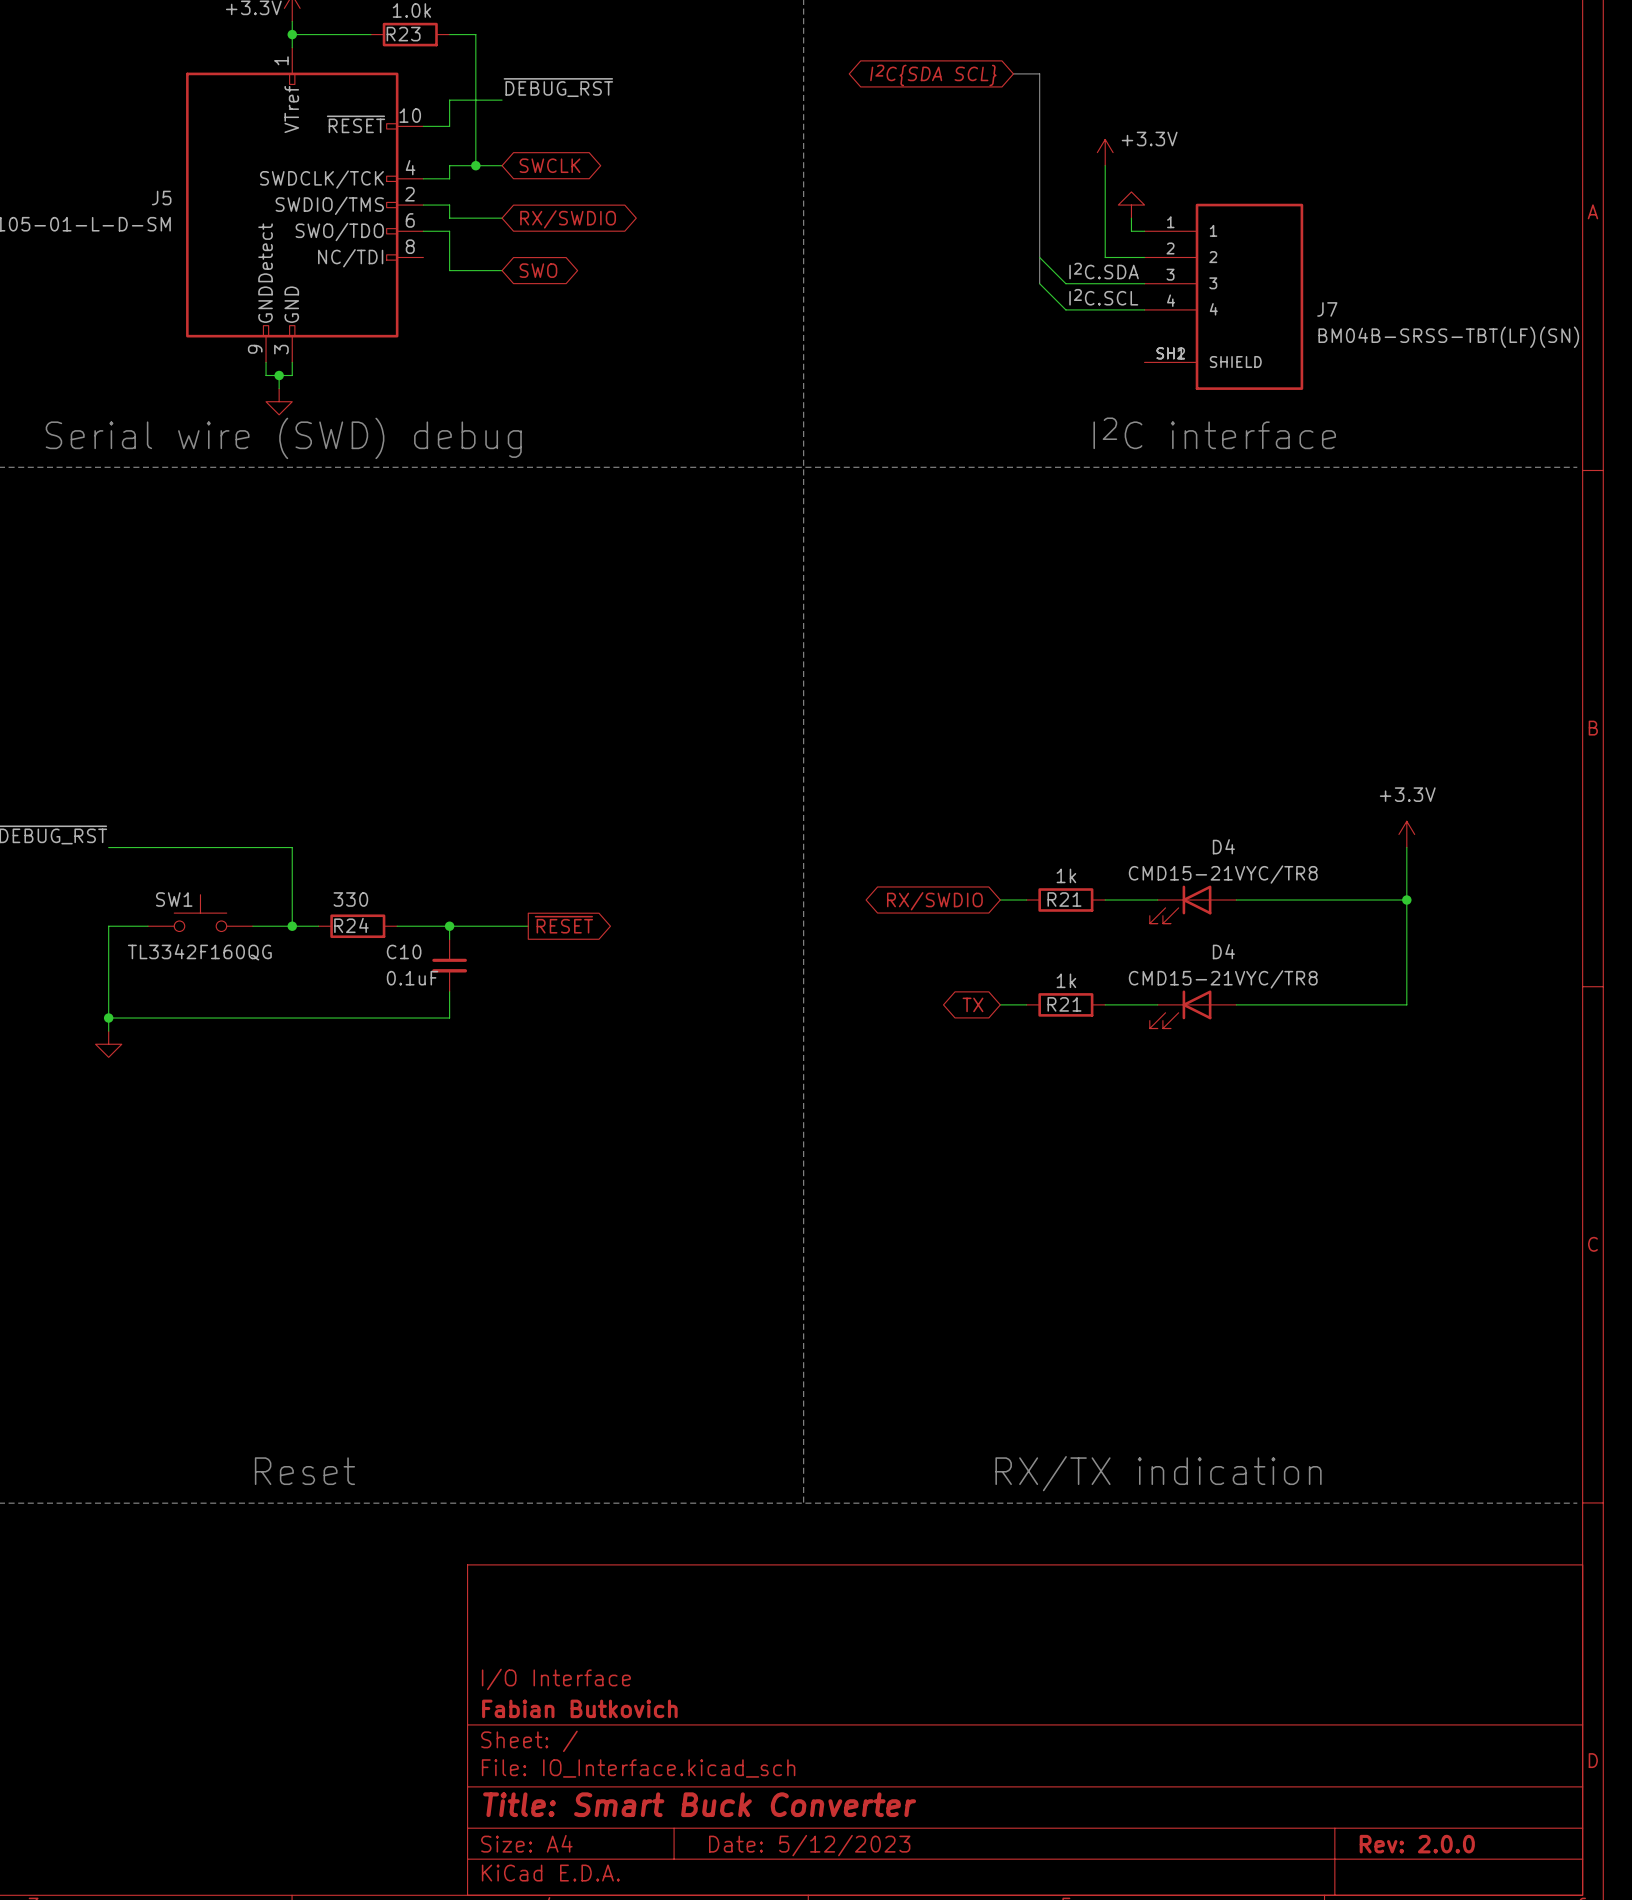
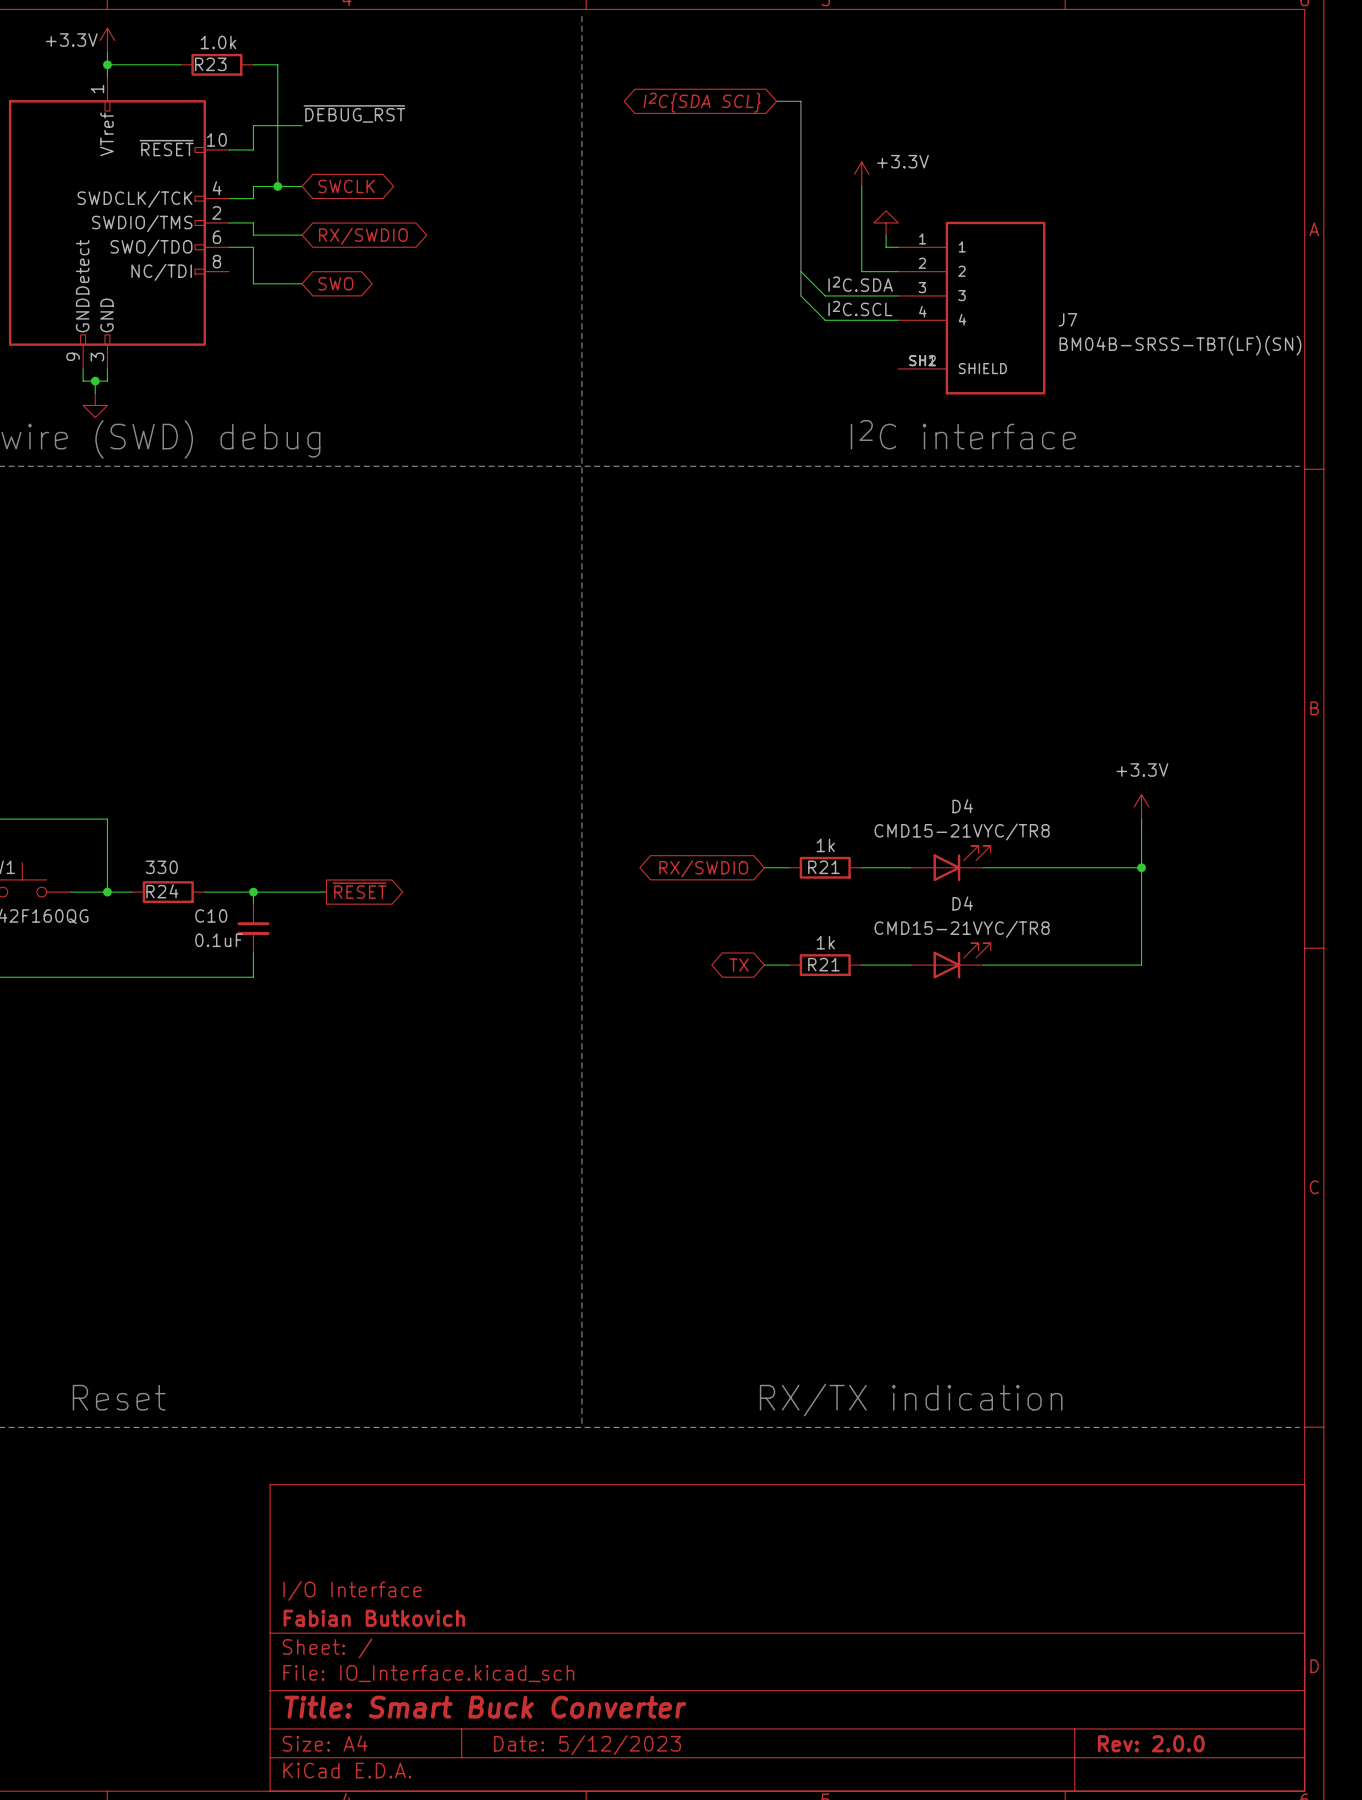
D4 rotation: 0° (1180, 904) -> 180° (962, 863)
D4 rotation: 0° (1180, 1009) -> 180° (962, 960)

